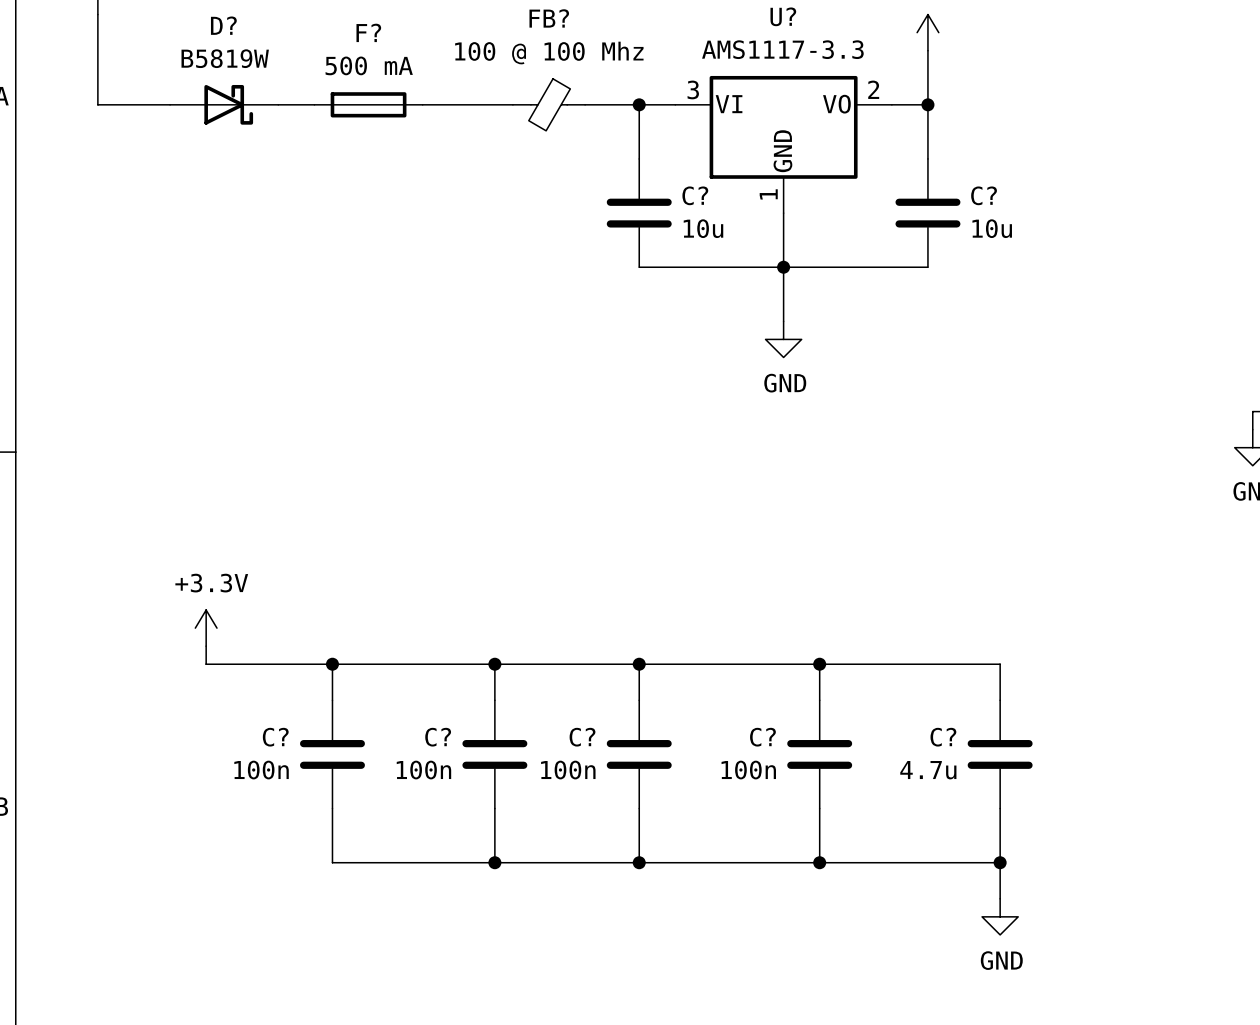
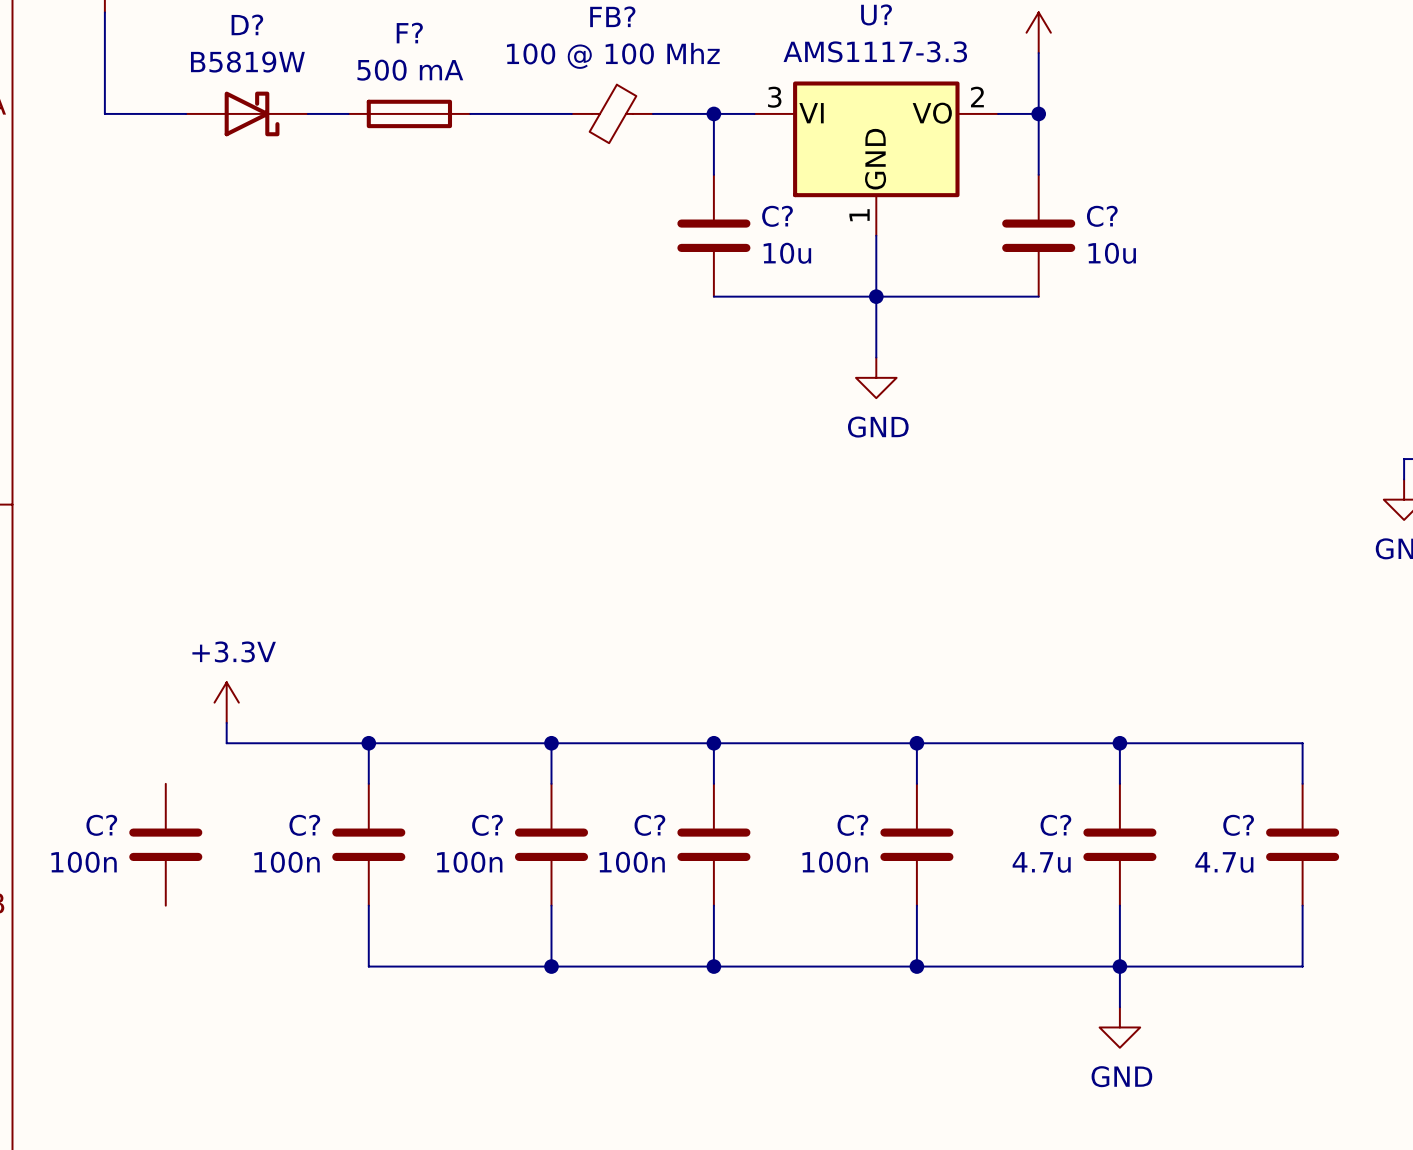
wire: none -> (1119, 743) (1302, 743) (1302, 783)
junction: none -> (1119, 743)
C?: none -> 100n (165, 844)
C?: none -> 4.7u (1302, 844)
wire: none -> (1302, 905) (1302, 966) (1119, 966)

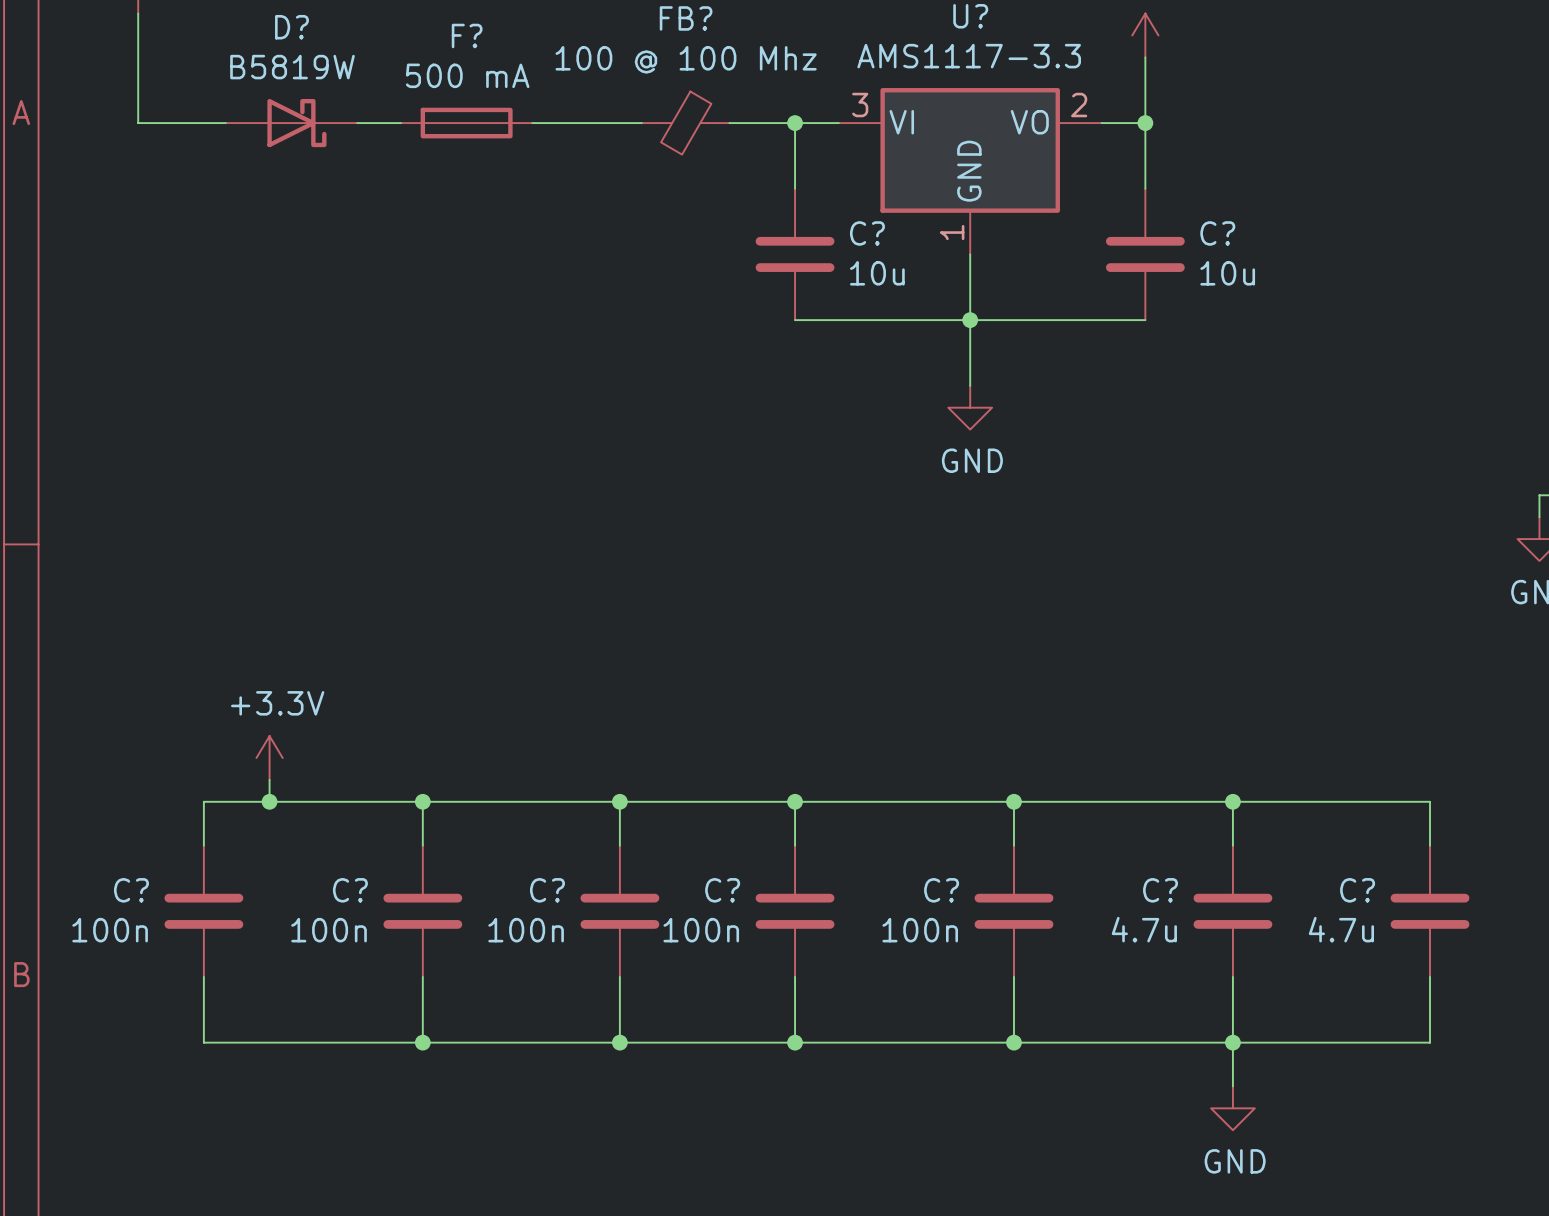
wire: none -> (269, 801) (203, 801) (203, 845)
junction: none -> (269, 801)
wire: none -> (203, 976) (203, 1042) (422, 1042)
junction: none -> (422, 1042)

